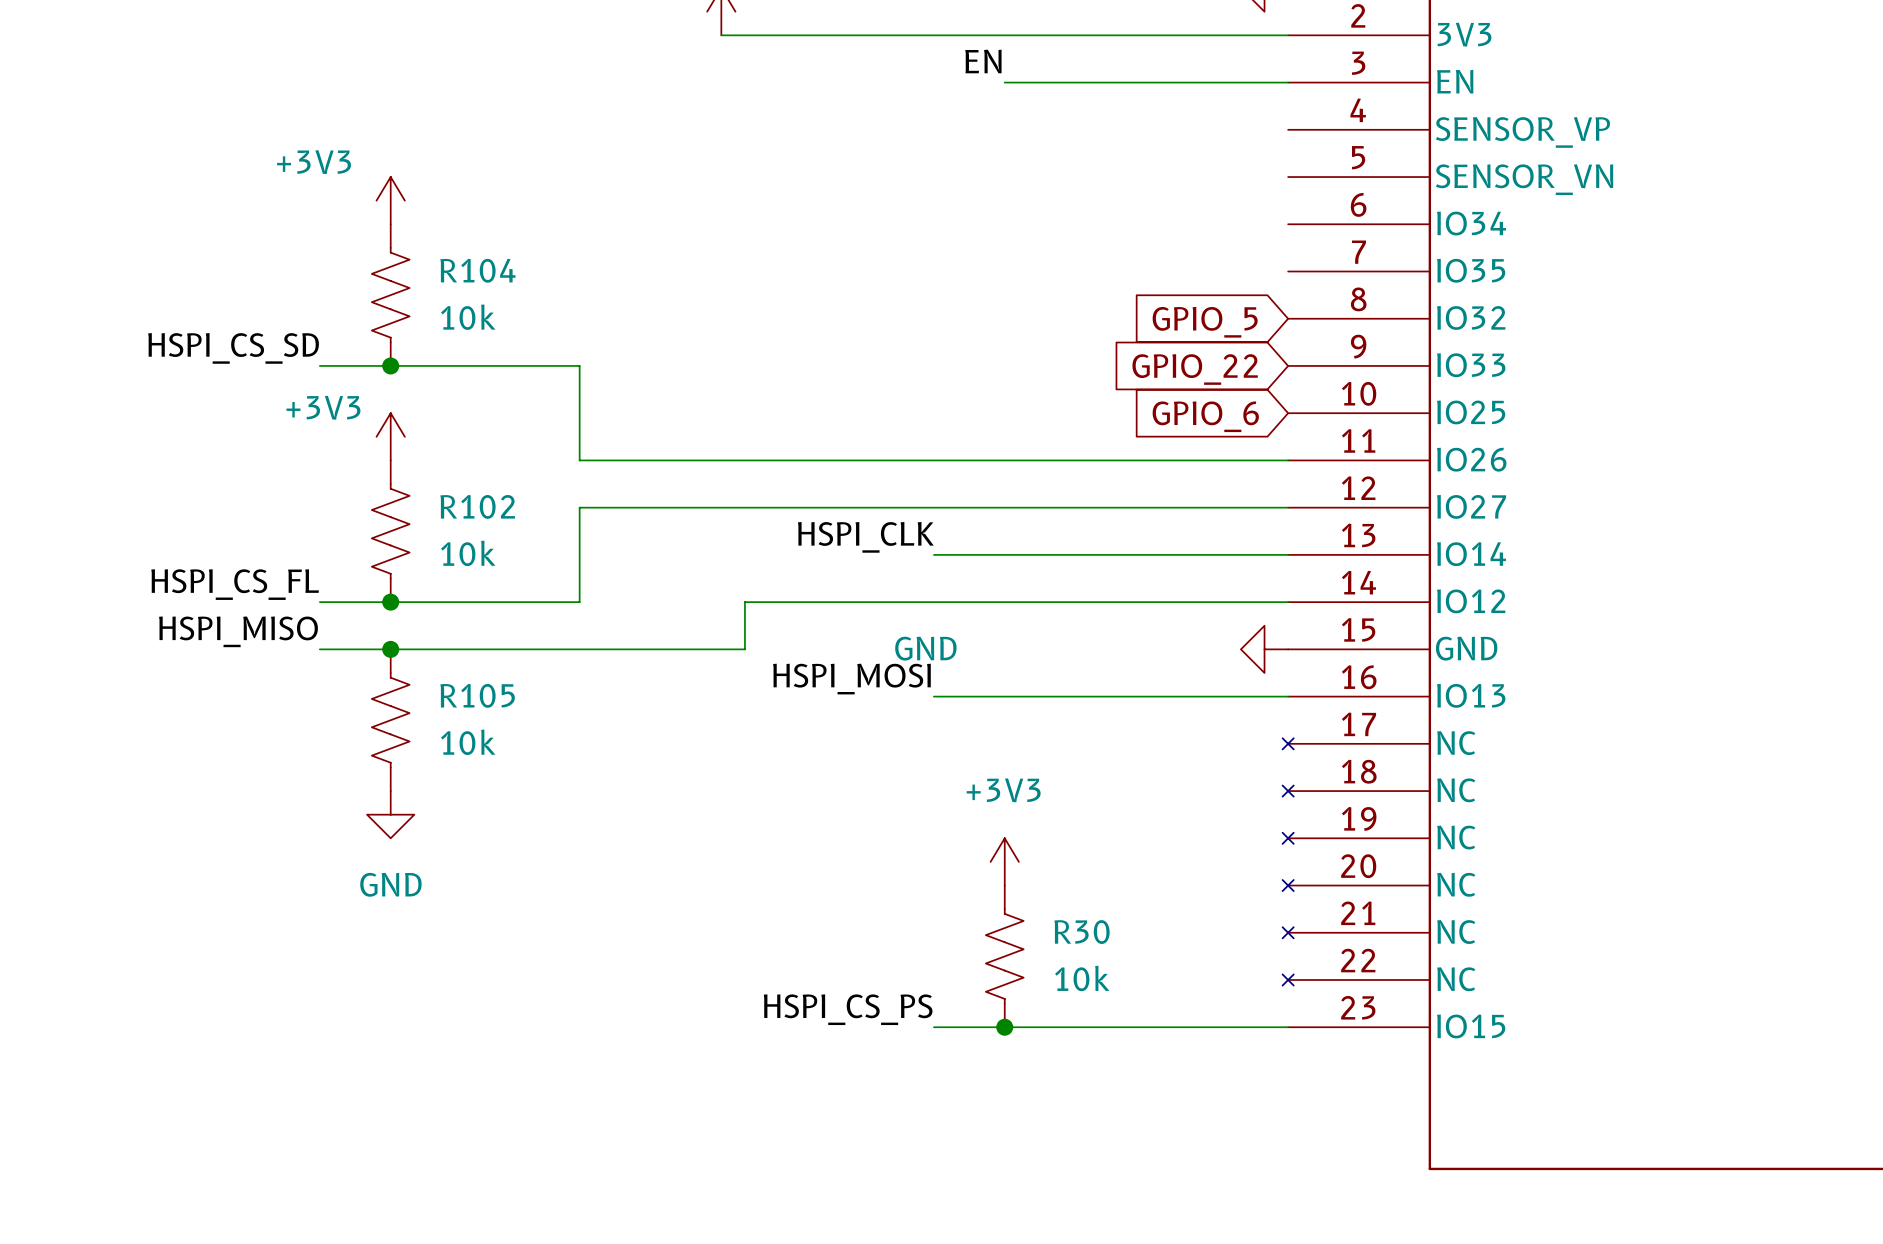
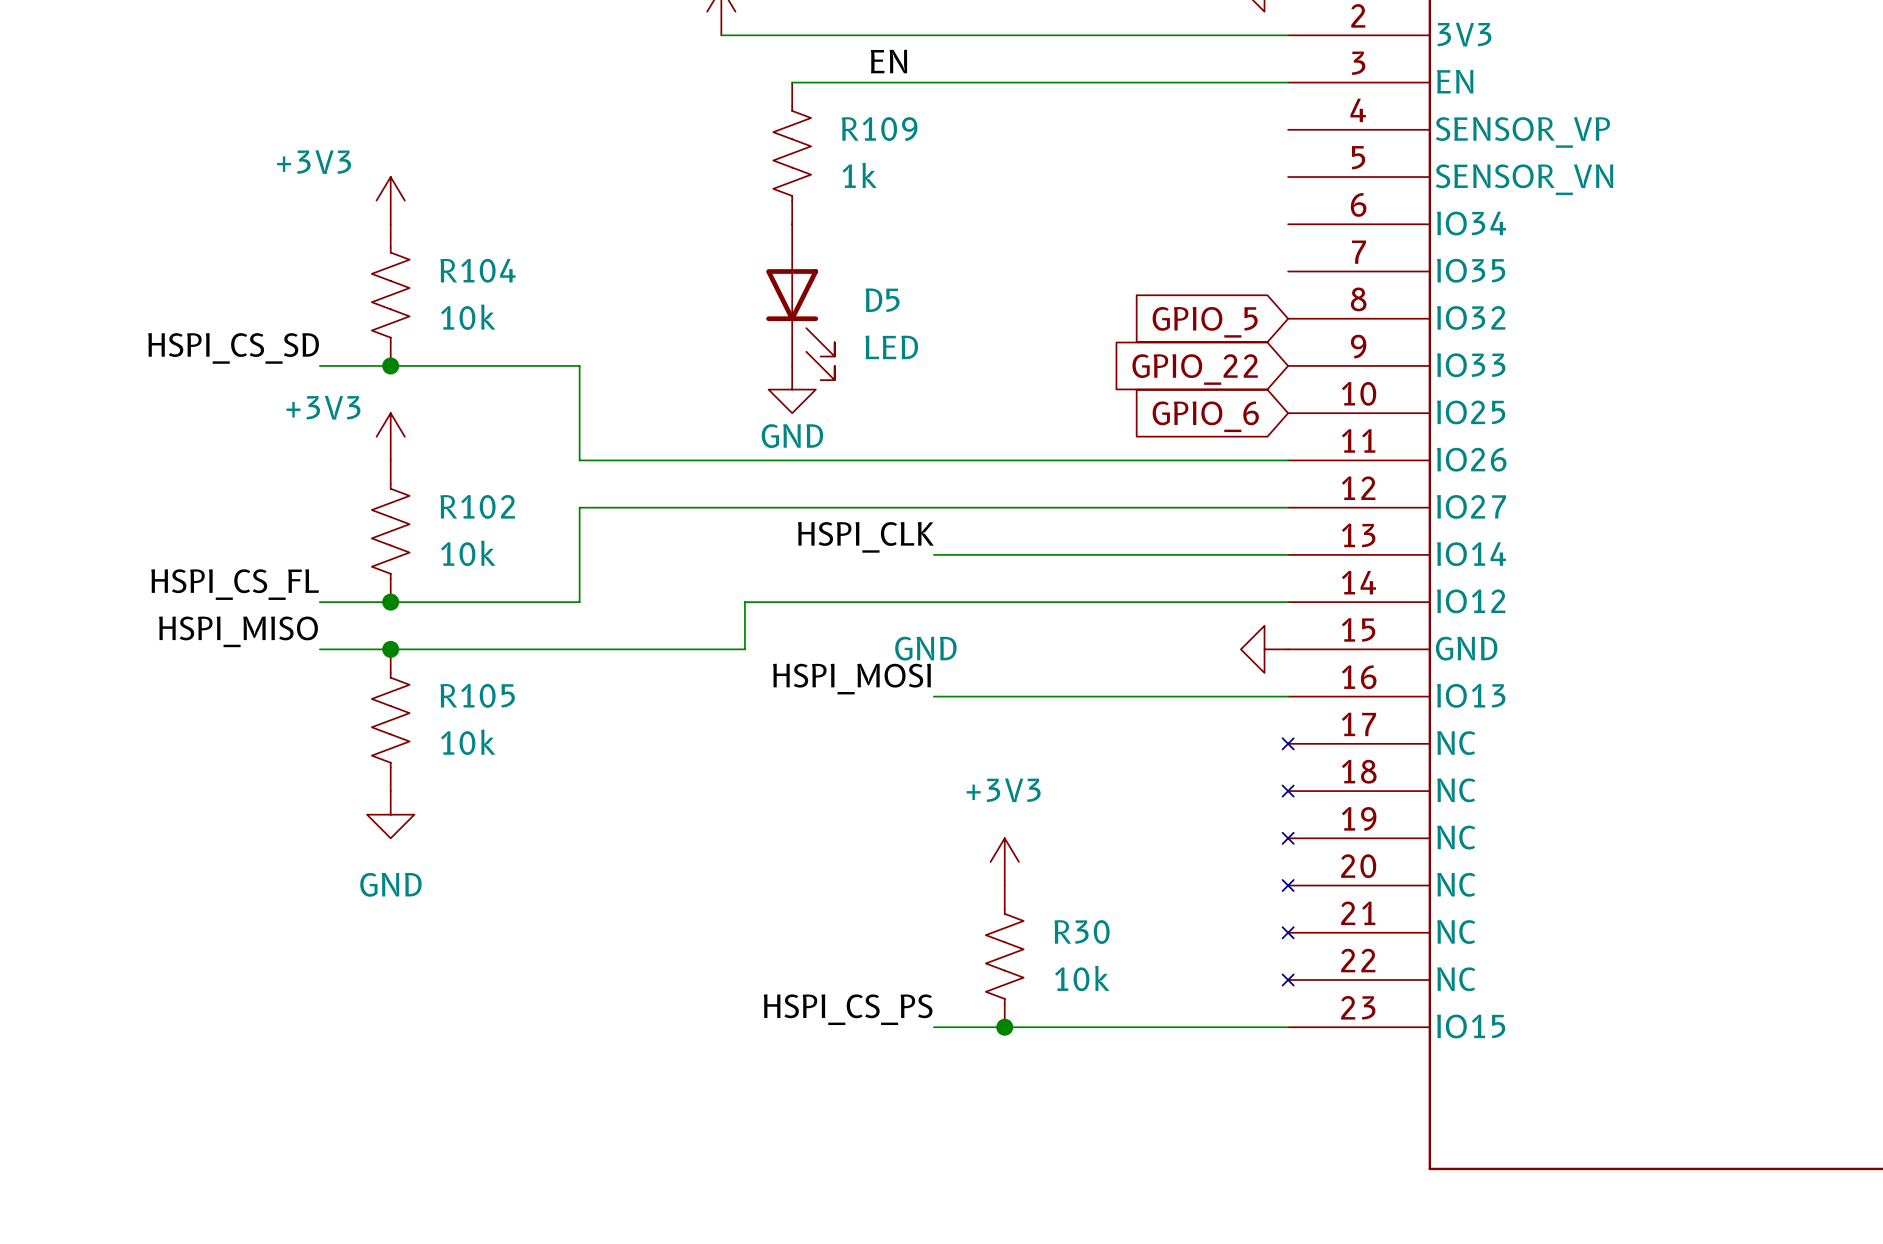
label position: EN (983, 61) -> EN (888, 61)
wire: none -> (792, 82) (1004, 82)
R109: none -> 1k (792, 153)
D5: none -> LED (800, 302)
power symbol: none -> GND (792, 389)

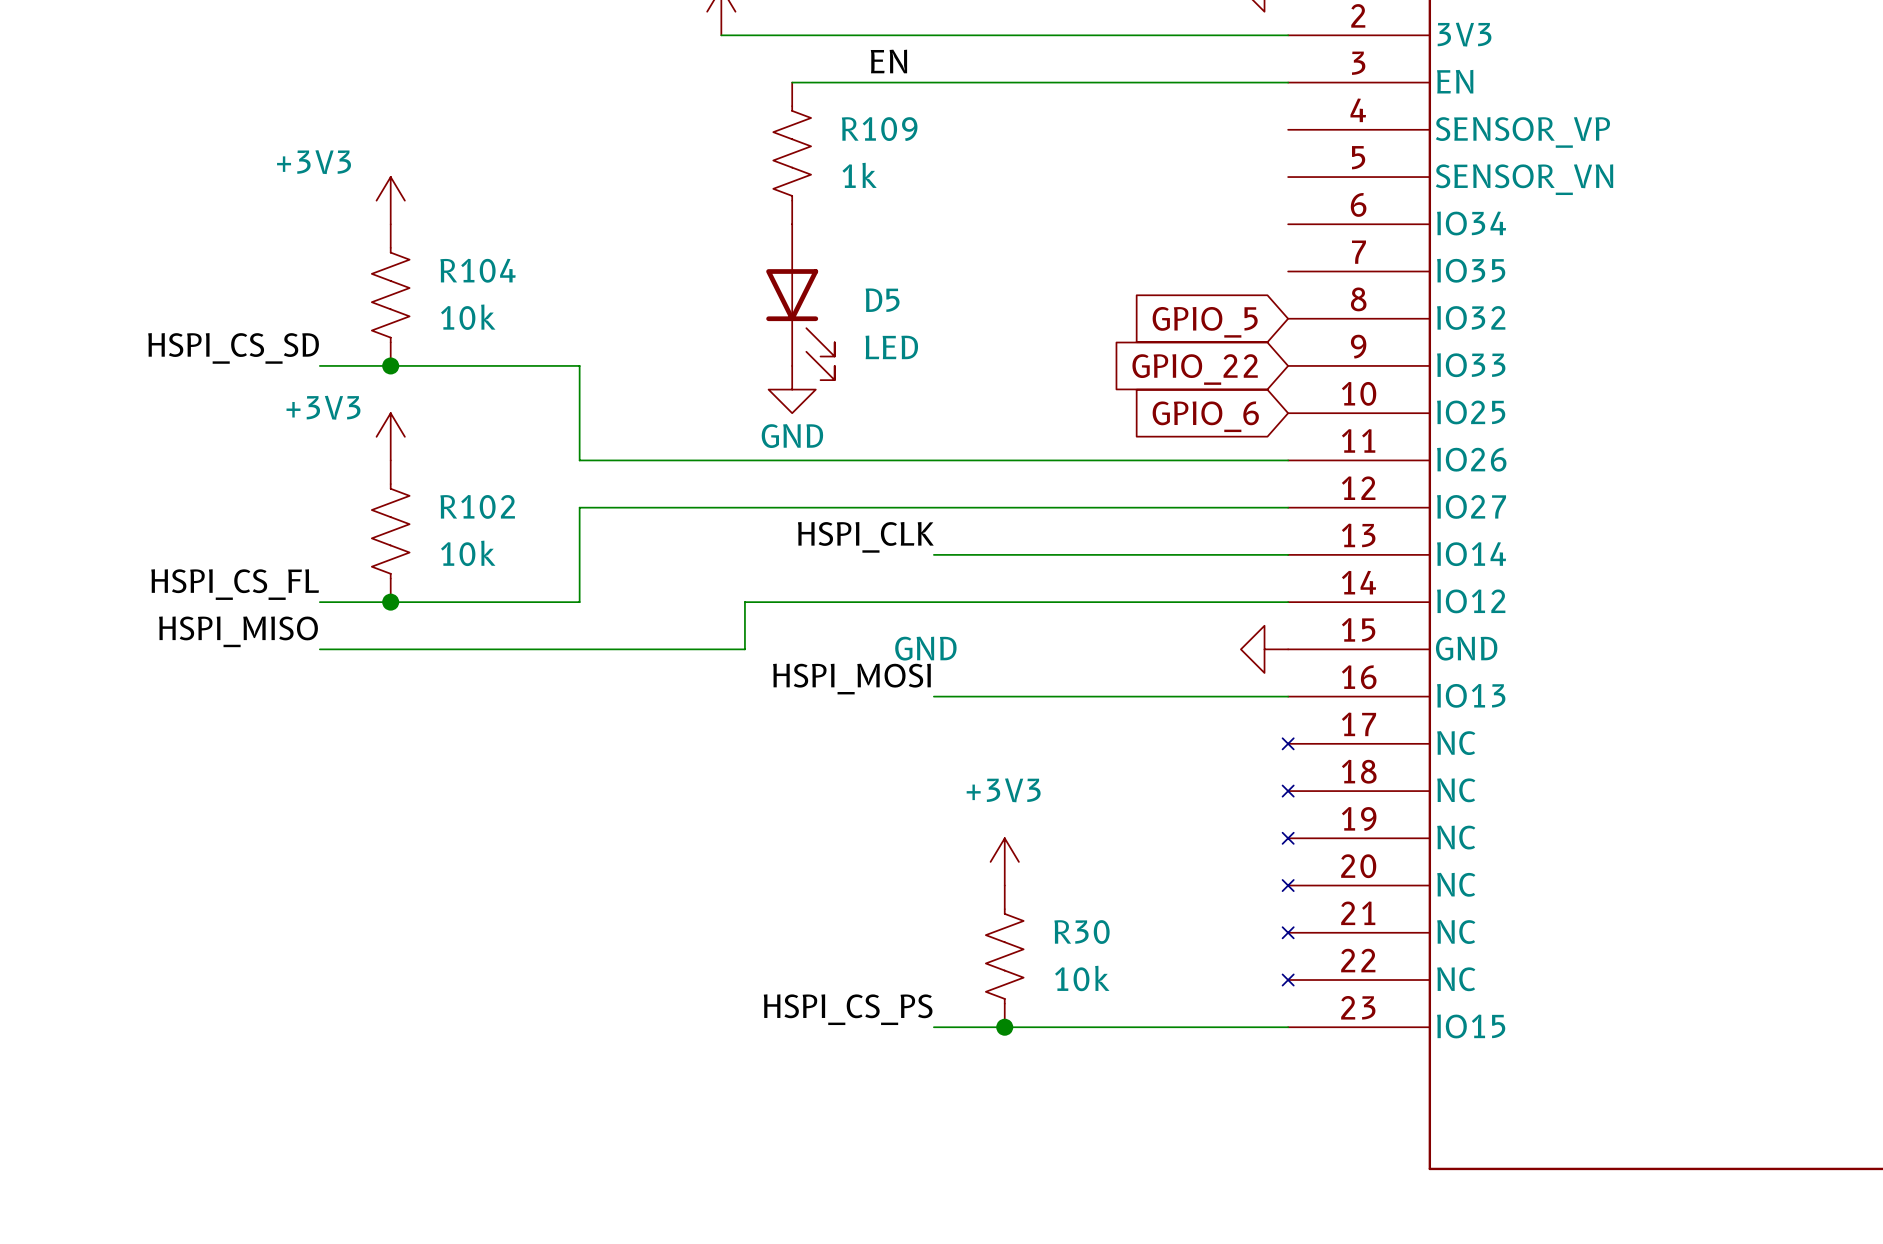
junction: (390, 649) -> none
R105: 10k (390, 720) -> none
power symbol: GND (390, 814) -> none

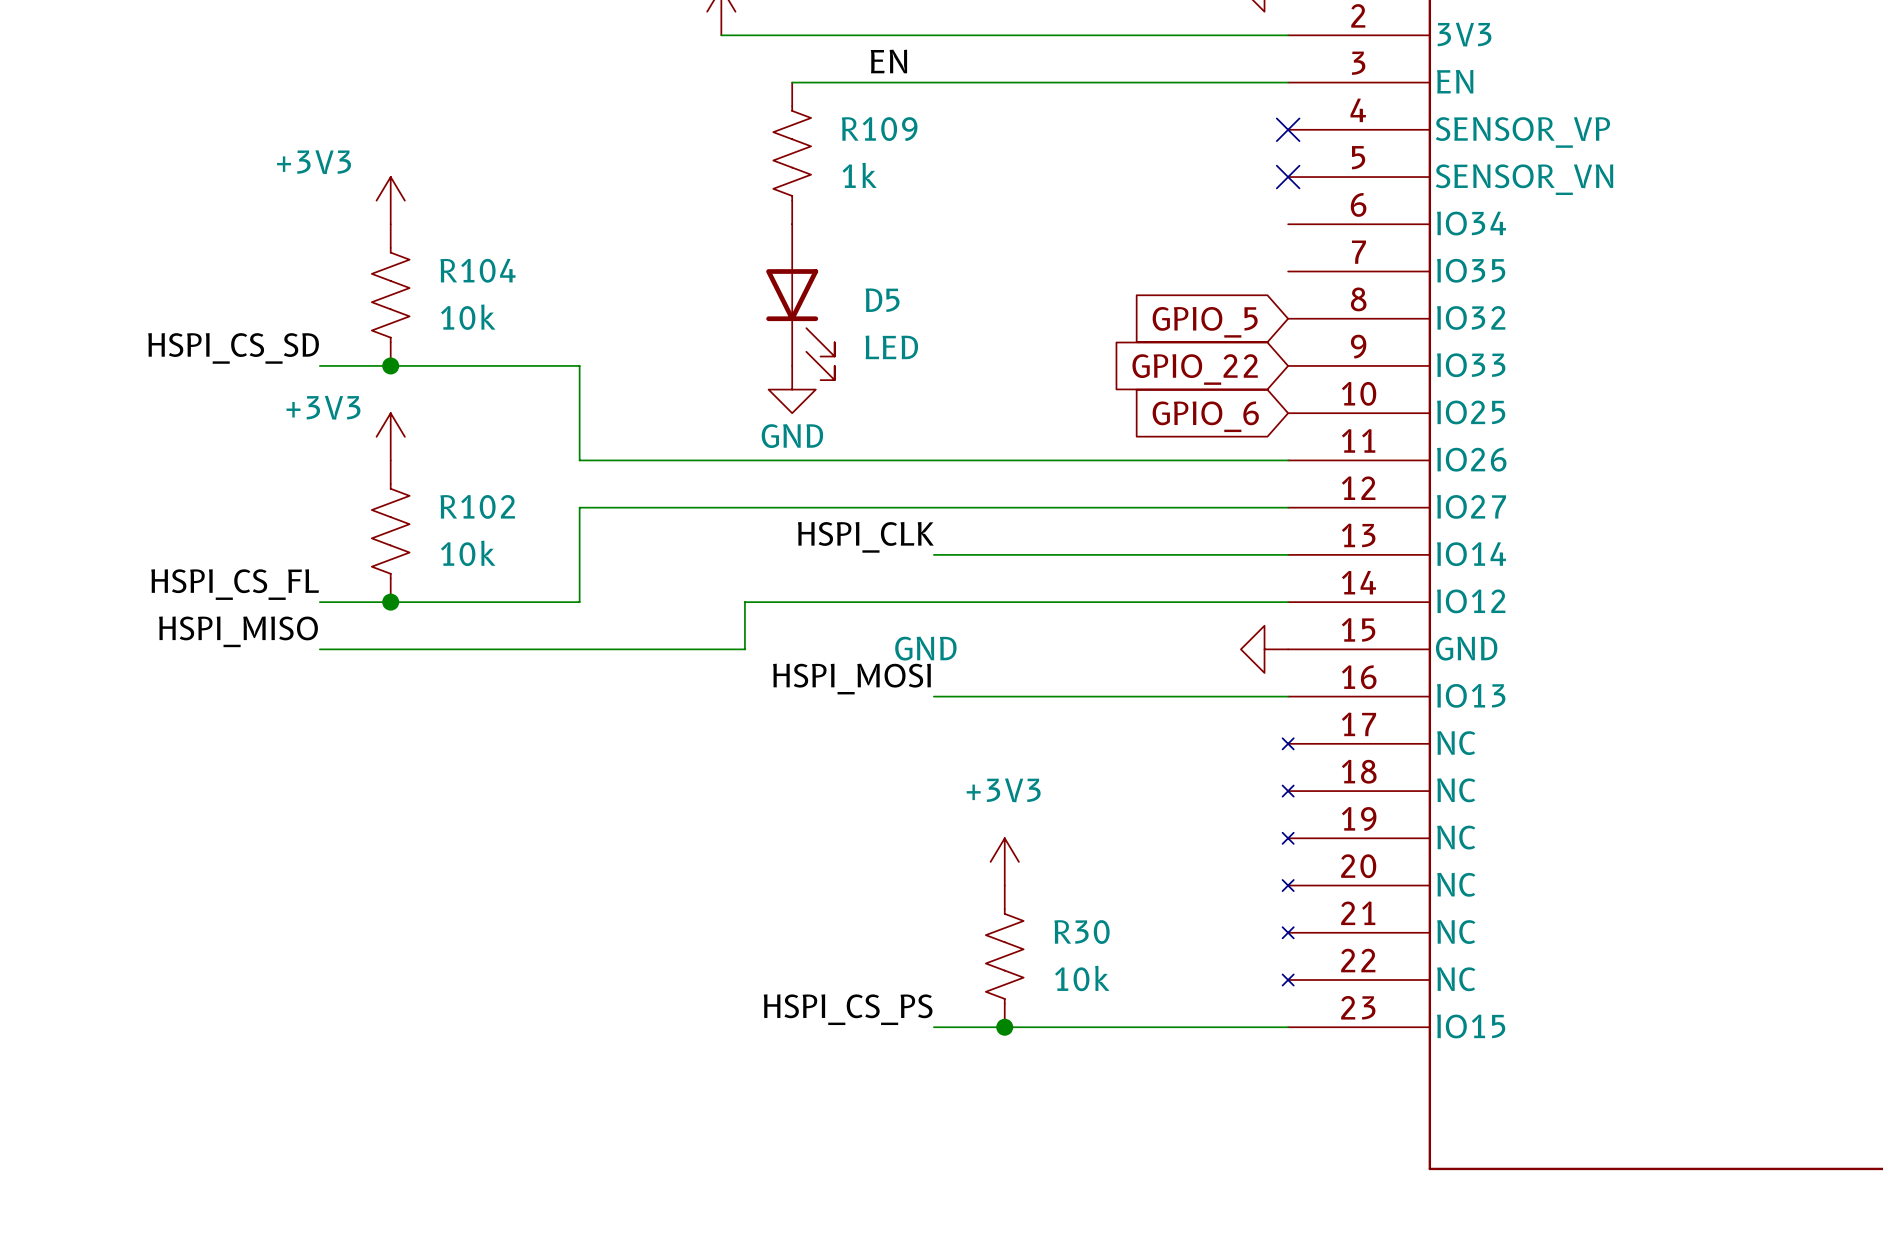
no-connect mark: none -> (1288, 129)
no-connect mark: none -> (1288, 177)

